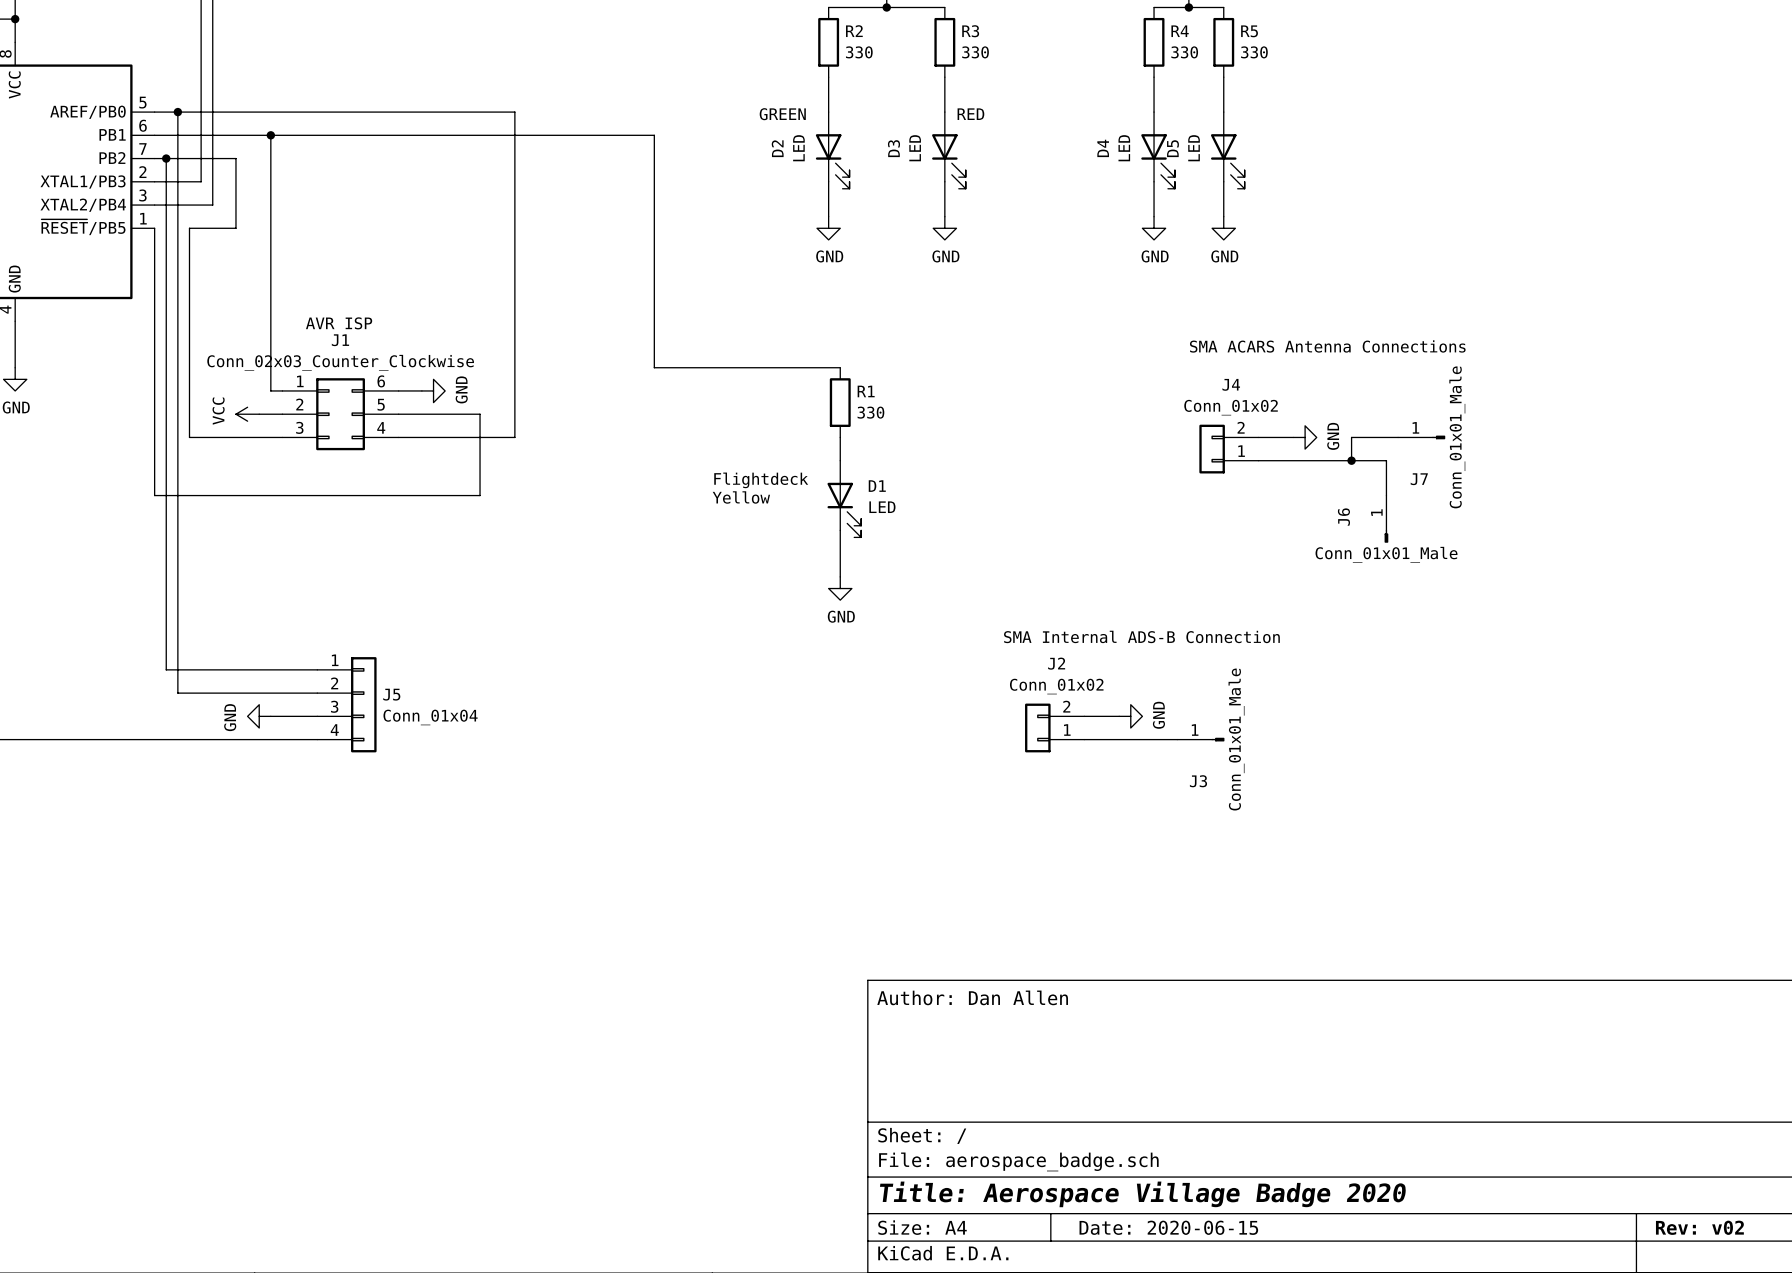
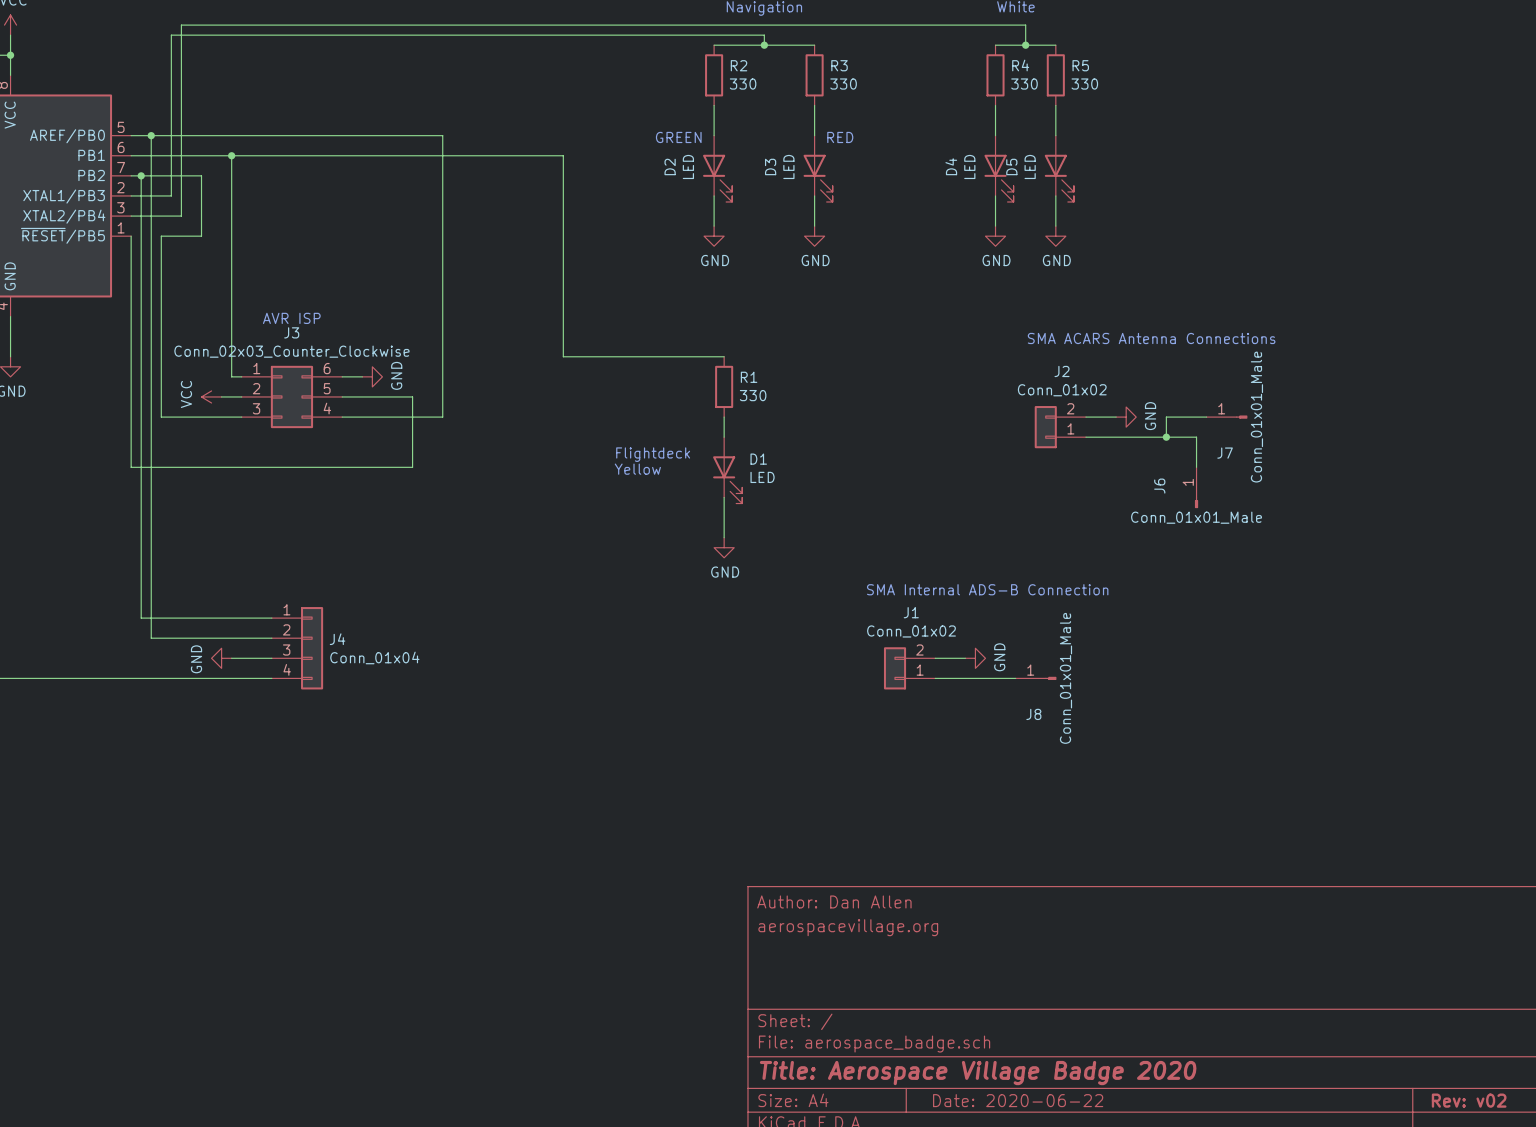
J1 name: J1 (340, 340) -> J3 (291, 332)
J4 name: J4 (1231, 384) -> J2 (1062, 371)
J2 name: J2 (1056, 663) -> J1 (911, 612)
J5 name: J5 (391, 694) -> J4 (337, 639)
J3 name: J3 (1198, 781) -> J8 (1033, 714)
title block: none -> aerospacevillage.org (848, 927)
title block: Date: 2020-06-15 (1168, 1227) -> Date: 2020-06-22 (1018, 1100)

